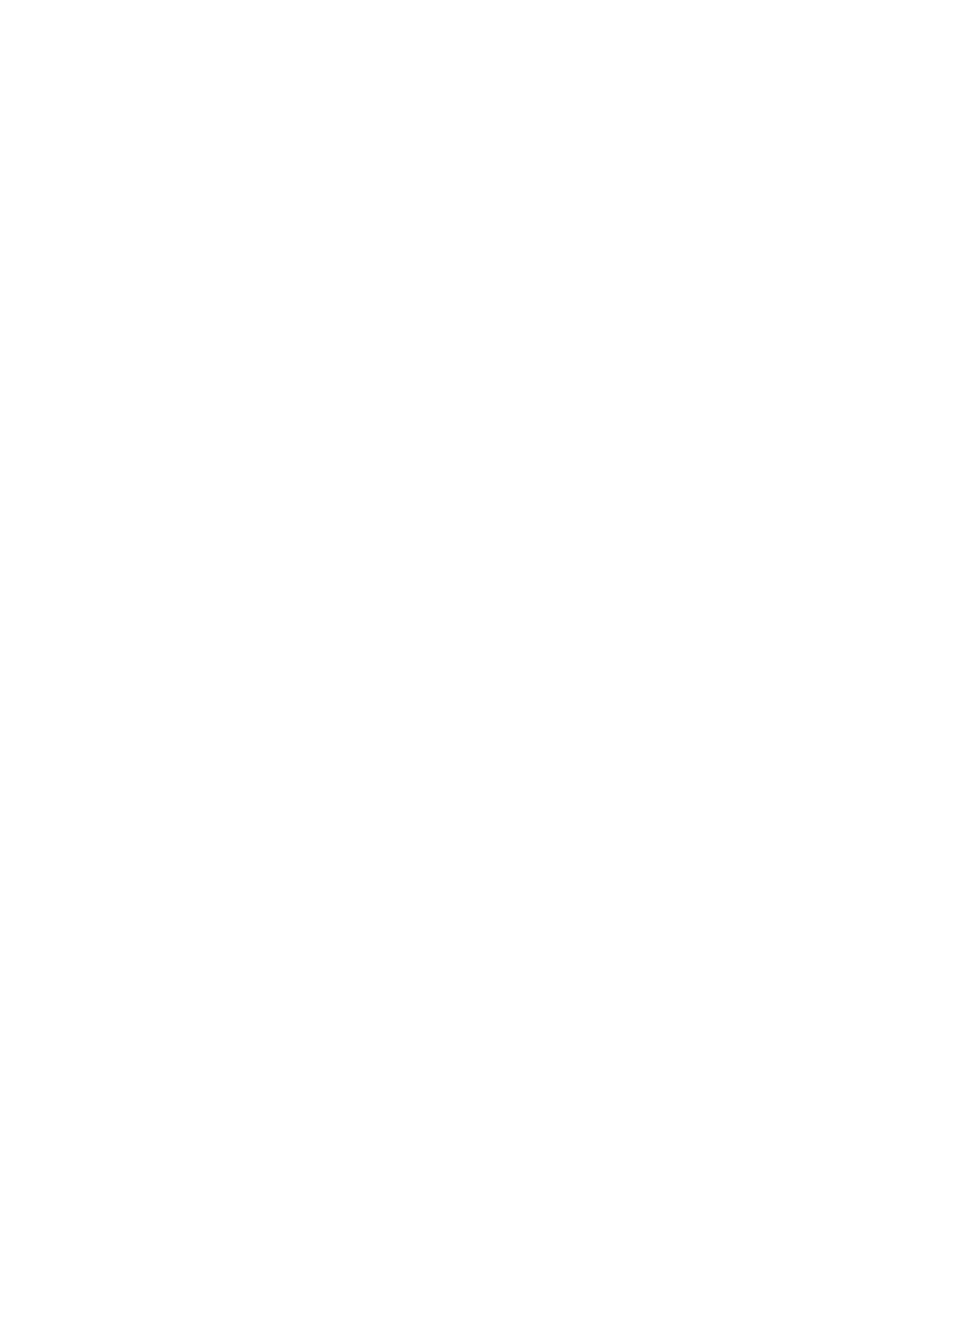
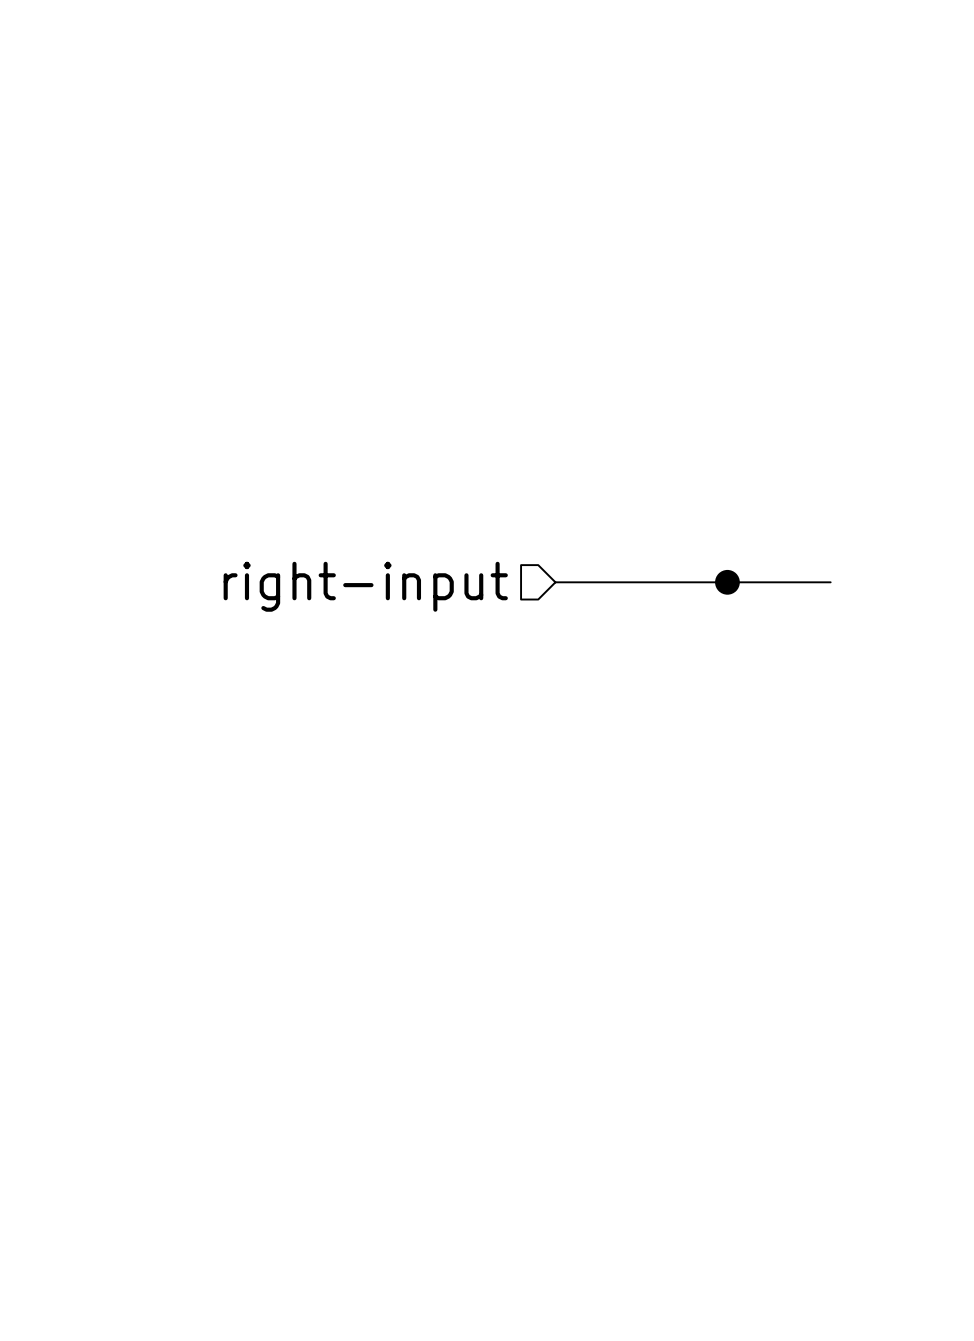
wire: none -> (555, 582) (830, 582)
junction: none -> (727, 582)
hierarchical label: none -> right-input (365, 586)

